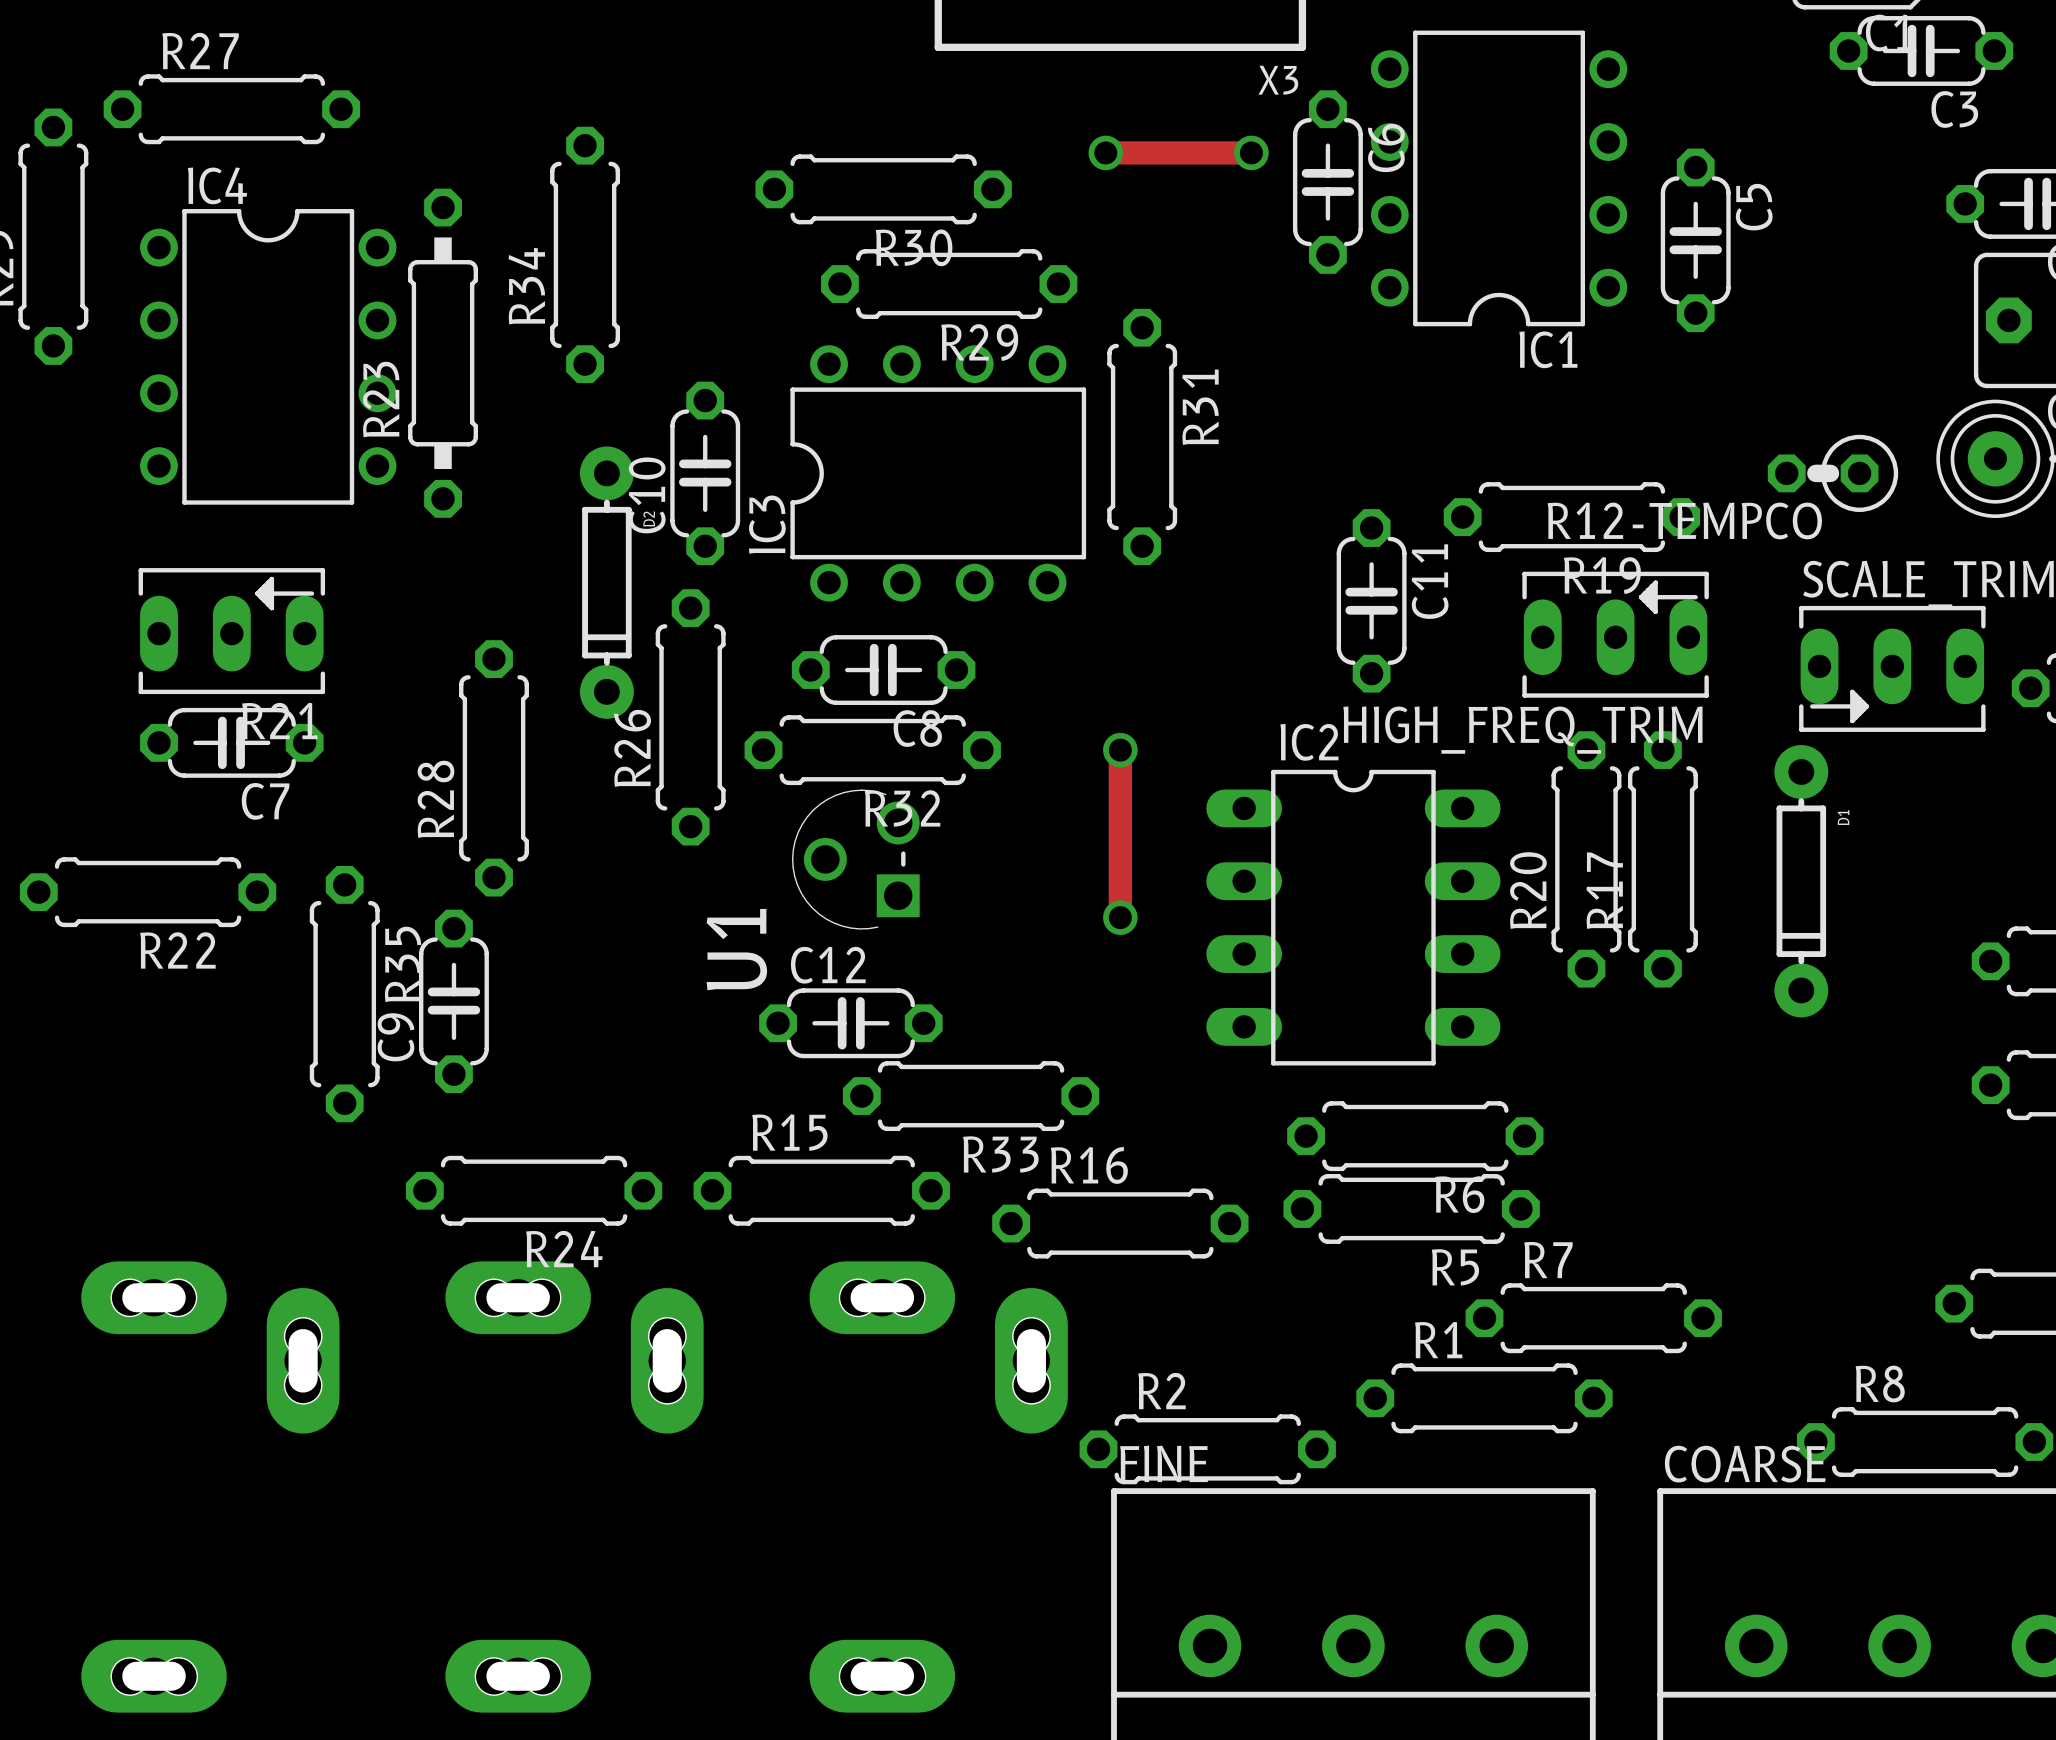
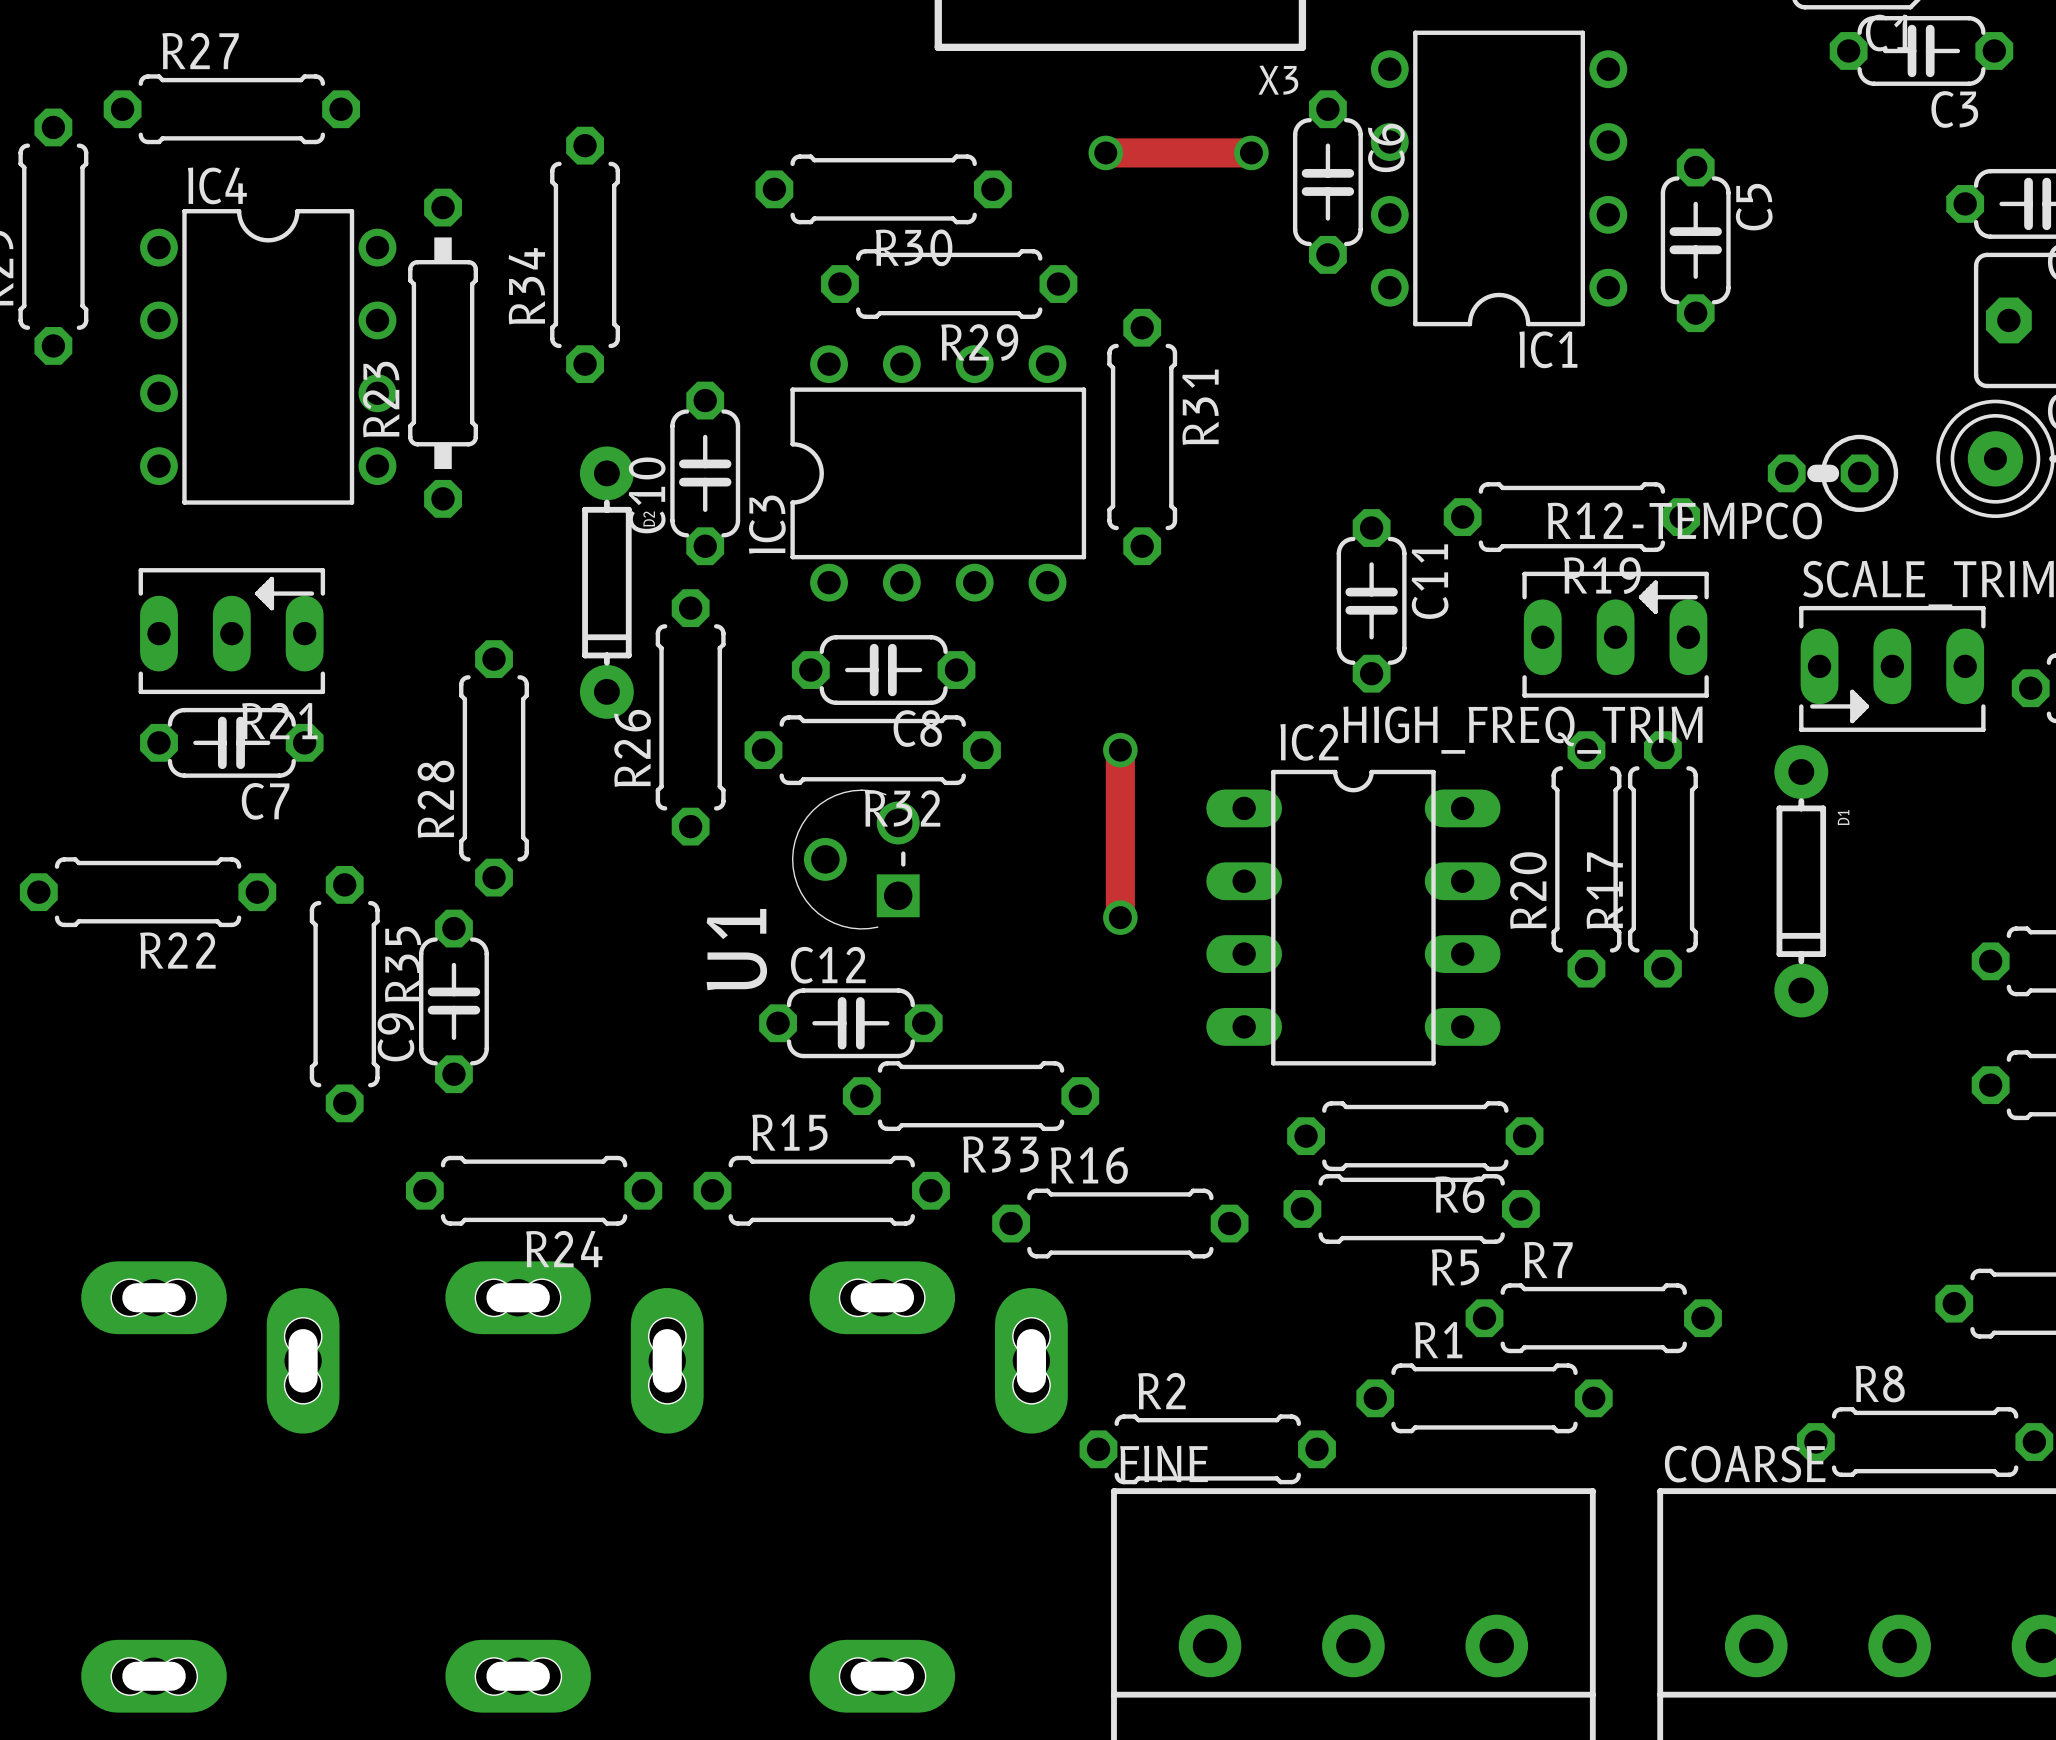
track width: thin (1105, 152) (1251, 152) -> thick (1105, 152) (1251, 152)
track width: thin (1120, 750) (1120, 917) -> thick (1120, 750) (1120, 917)

